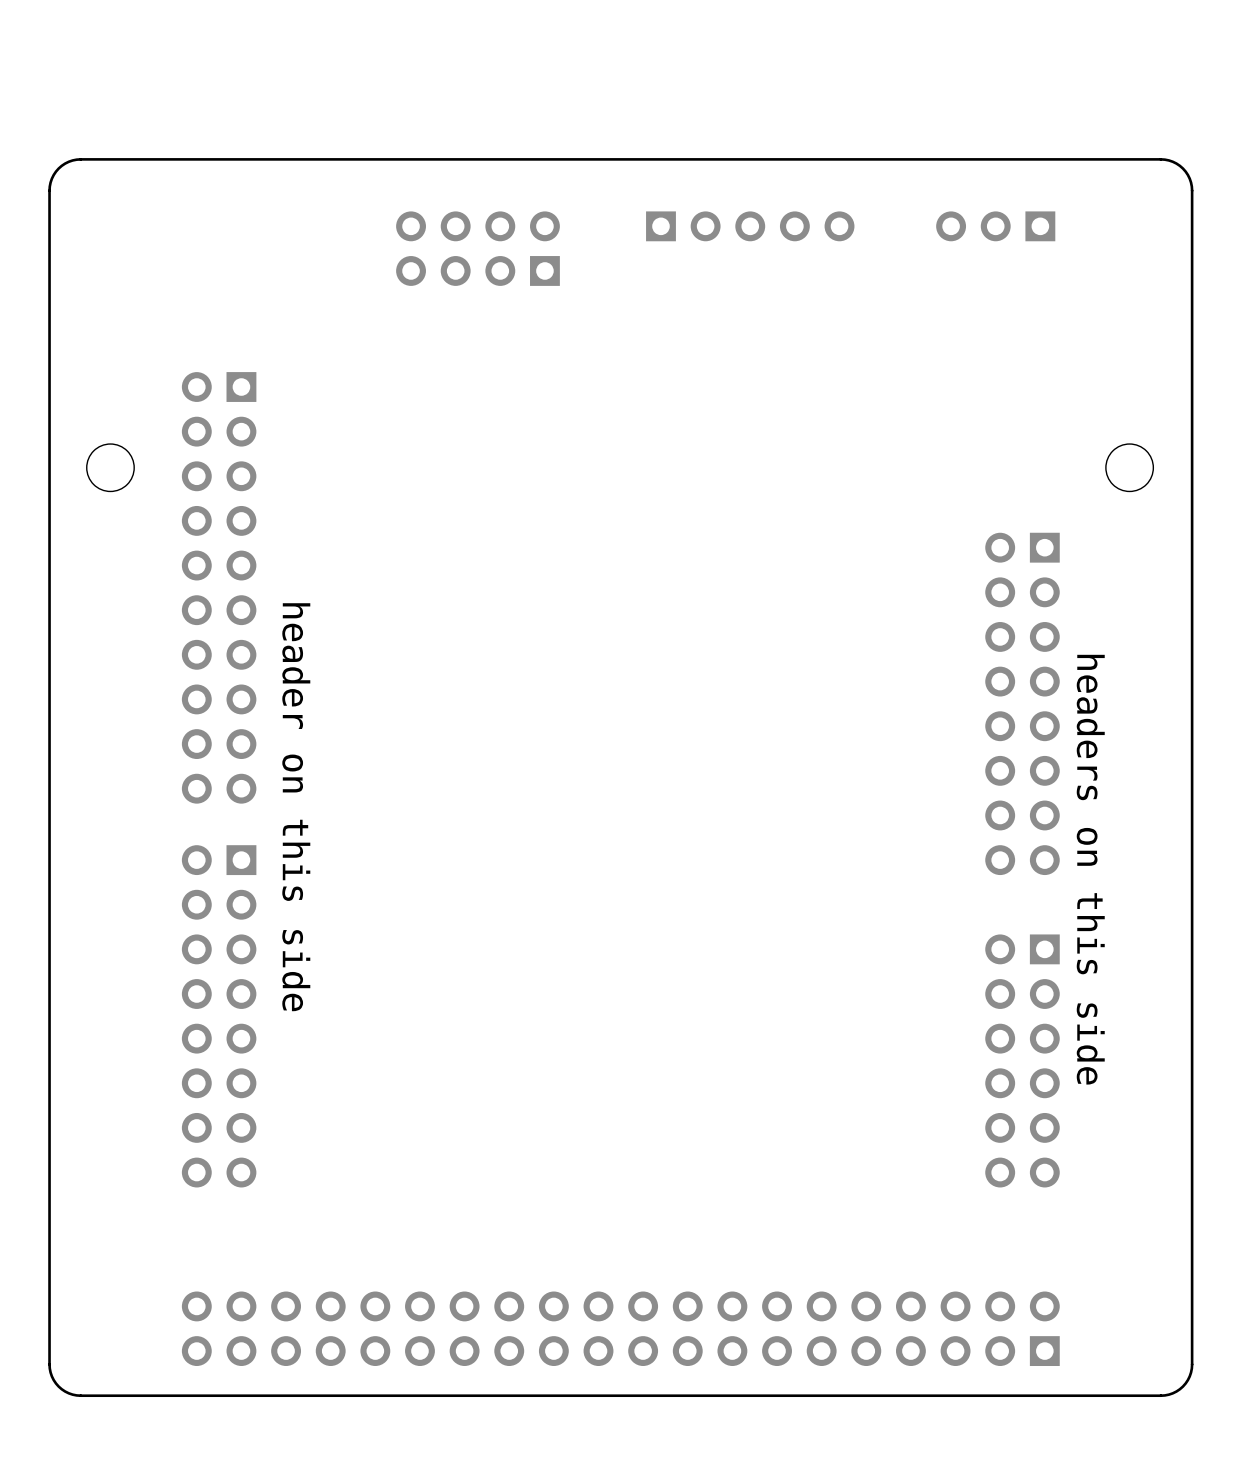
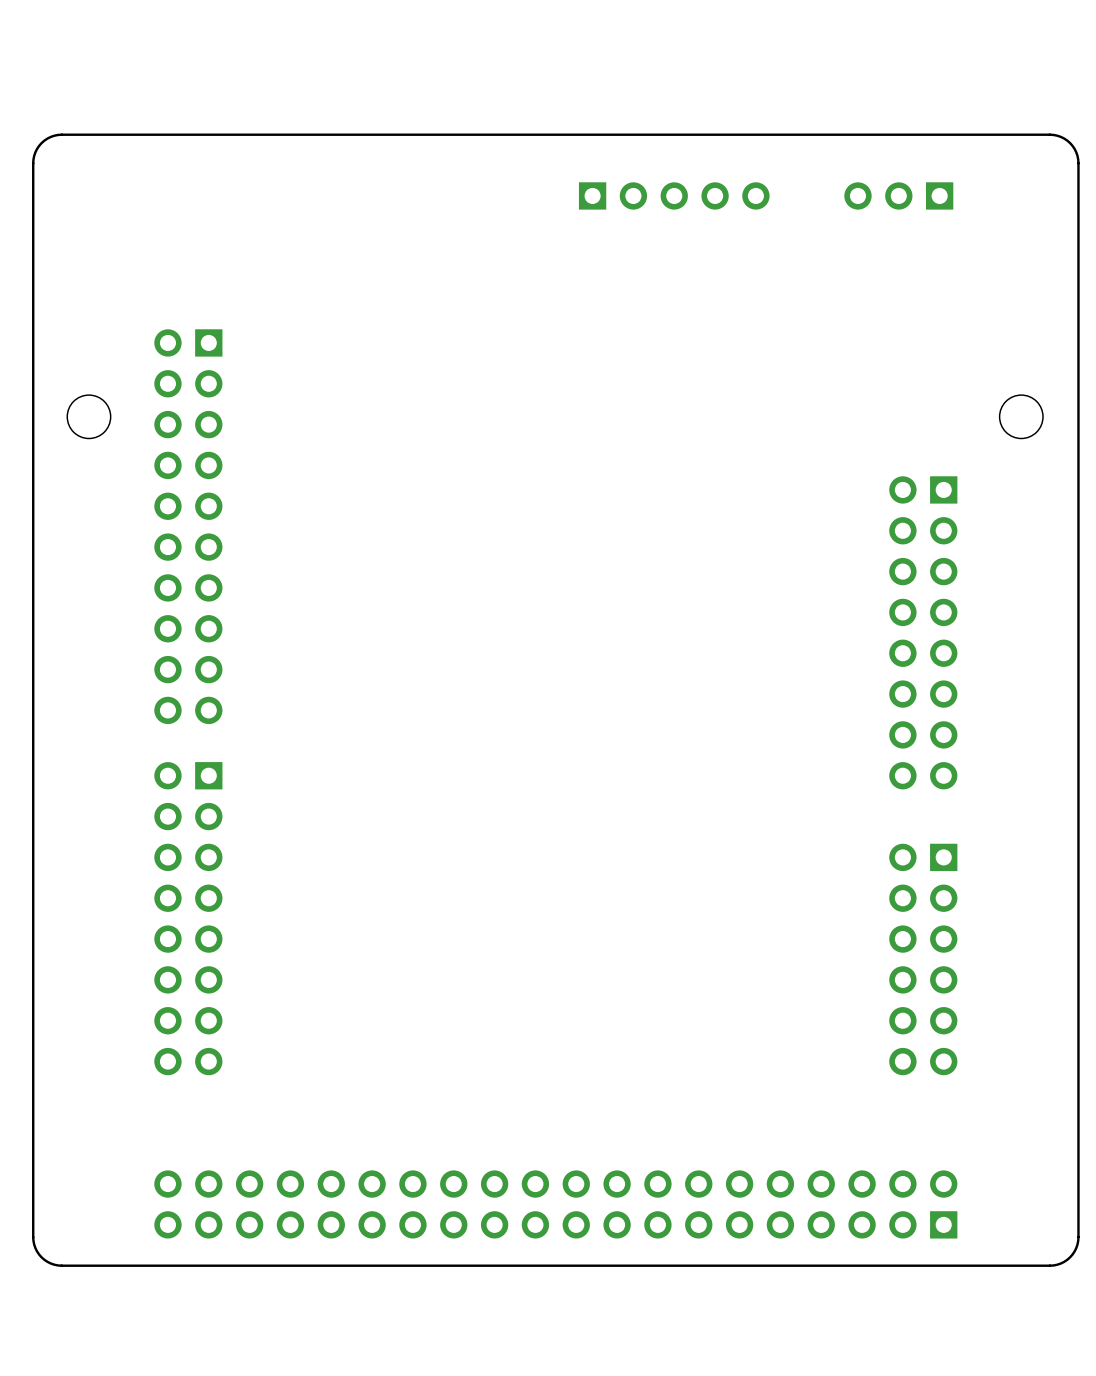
part: (477, 248) -> none
text: header on this side (296, 807) -> none
text: headers on this side (1090, 869) -> none

